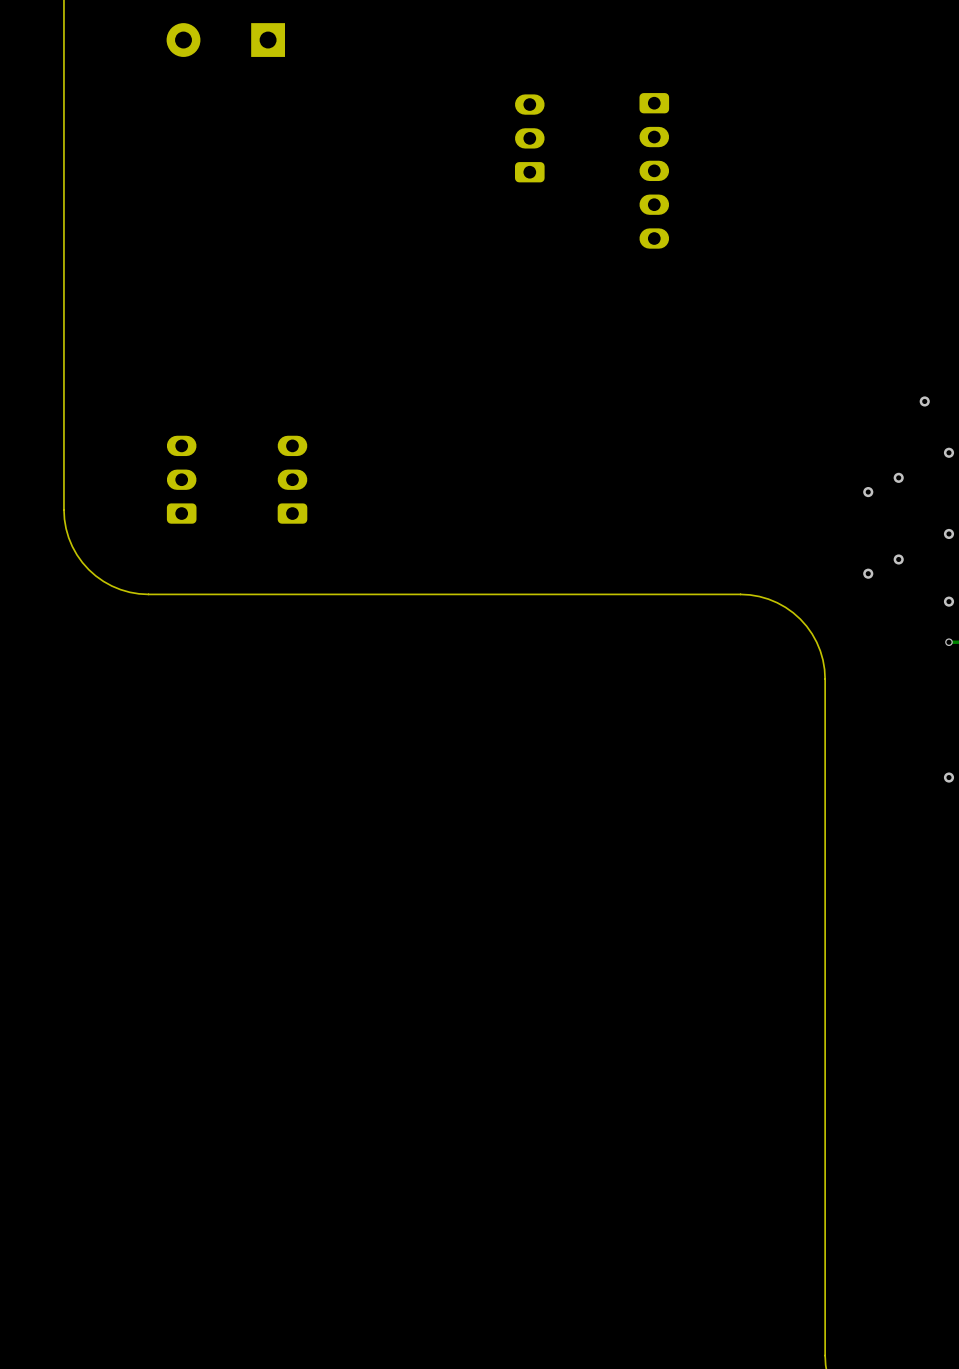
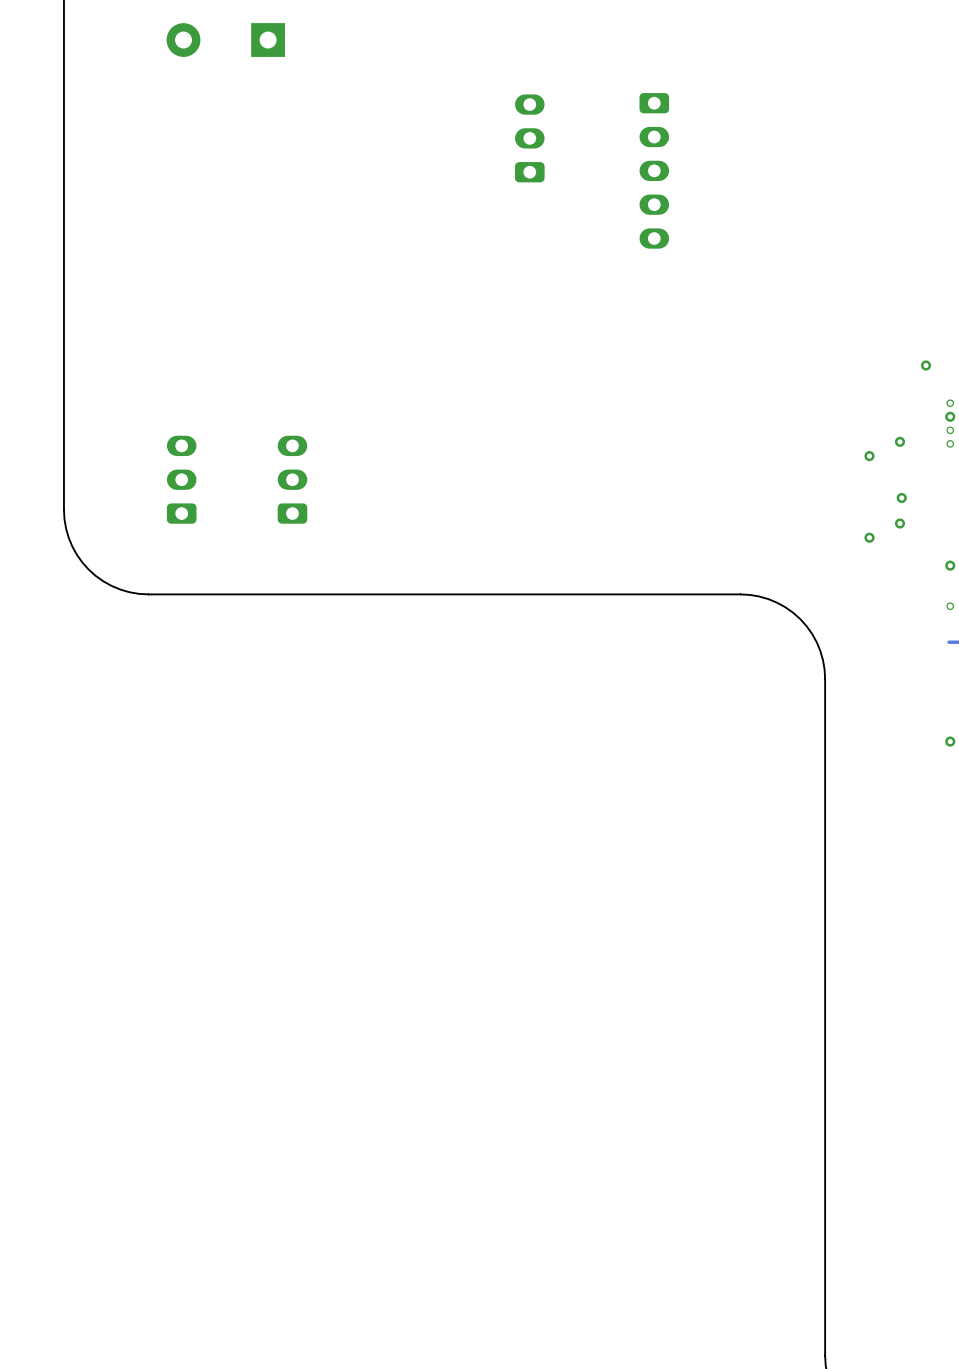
via: none -> (926, 365)
via: (924, 401) -> none
via: none -> (950, 403)
via: none -> (950, 416)
via: none -> (950, 430)
via: none -> (899, 441)
via: none -> (950, 443)
via: (948, 452) -> none
via: none -> (869, 456)
via: (898, 477) -> none
via: (868, 492) -> none
via: none -> (901, 497)
via: none -> (899, 523)
via: (948, 533) -> none
via: none -> (869, 537)
via: (898, 559) -> none
via: none -> (950, 565)
via: (868, 573) -> none
via: (948, 601) -> none
via position: (948, 642) -> (950, 606)
via position: (948, 777) -> (950, 741)

